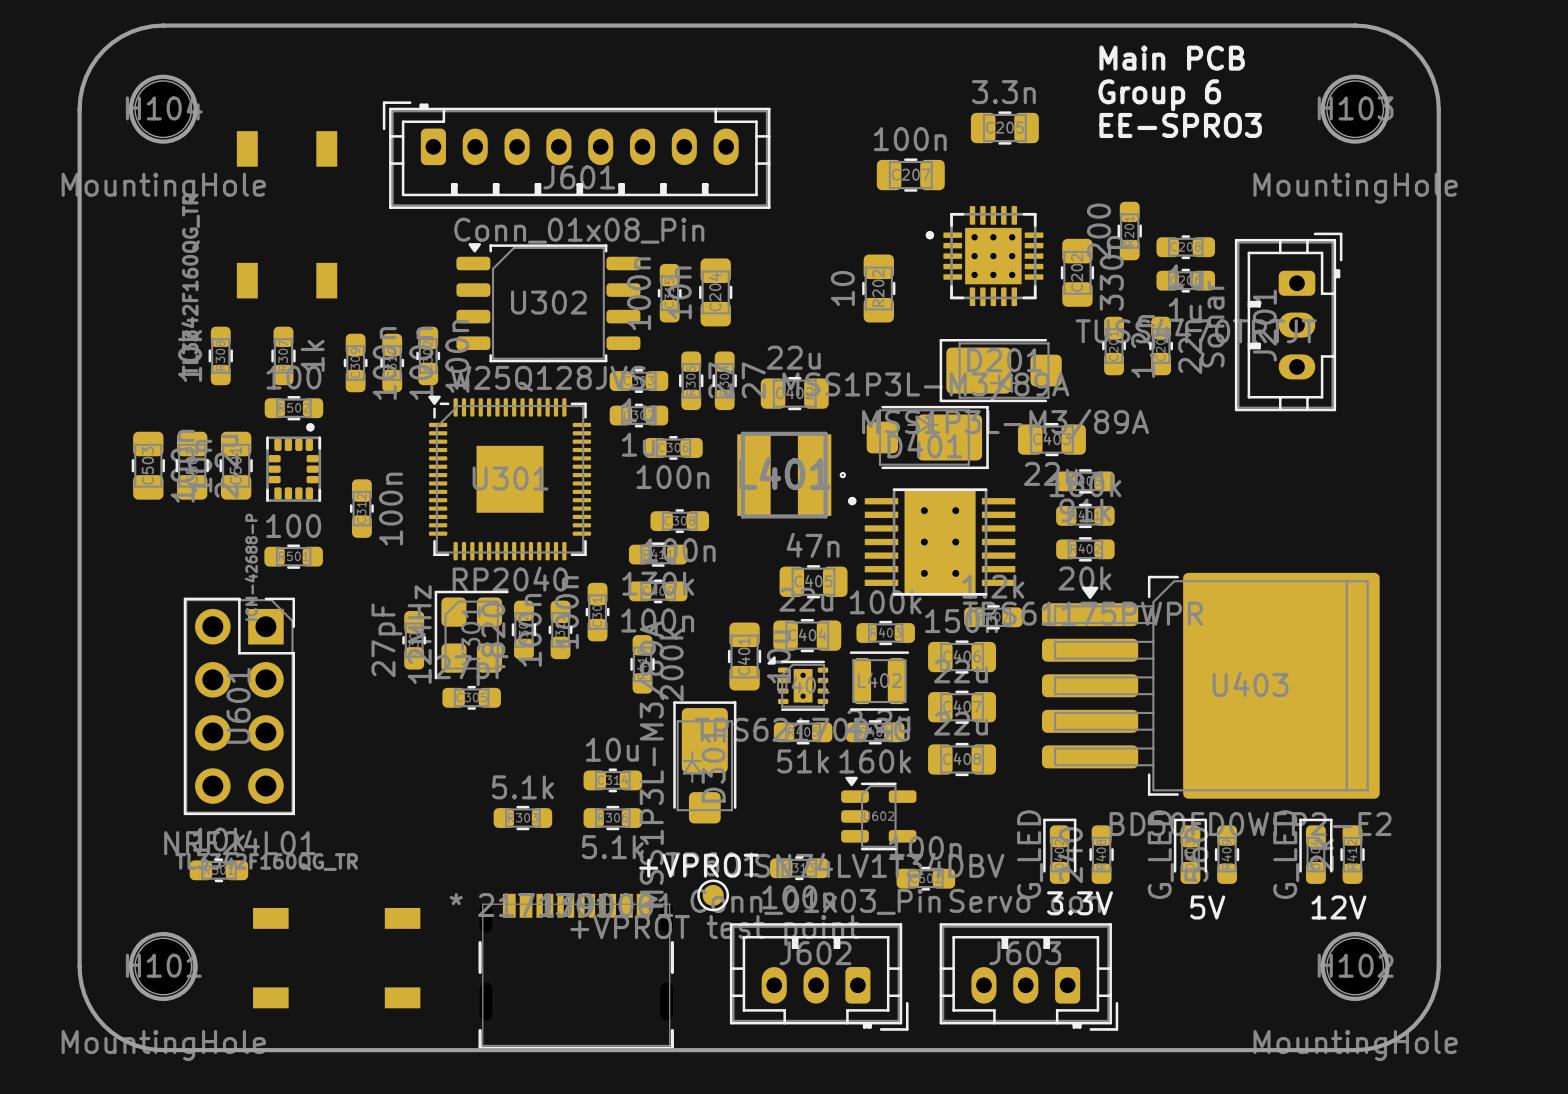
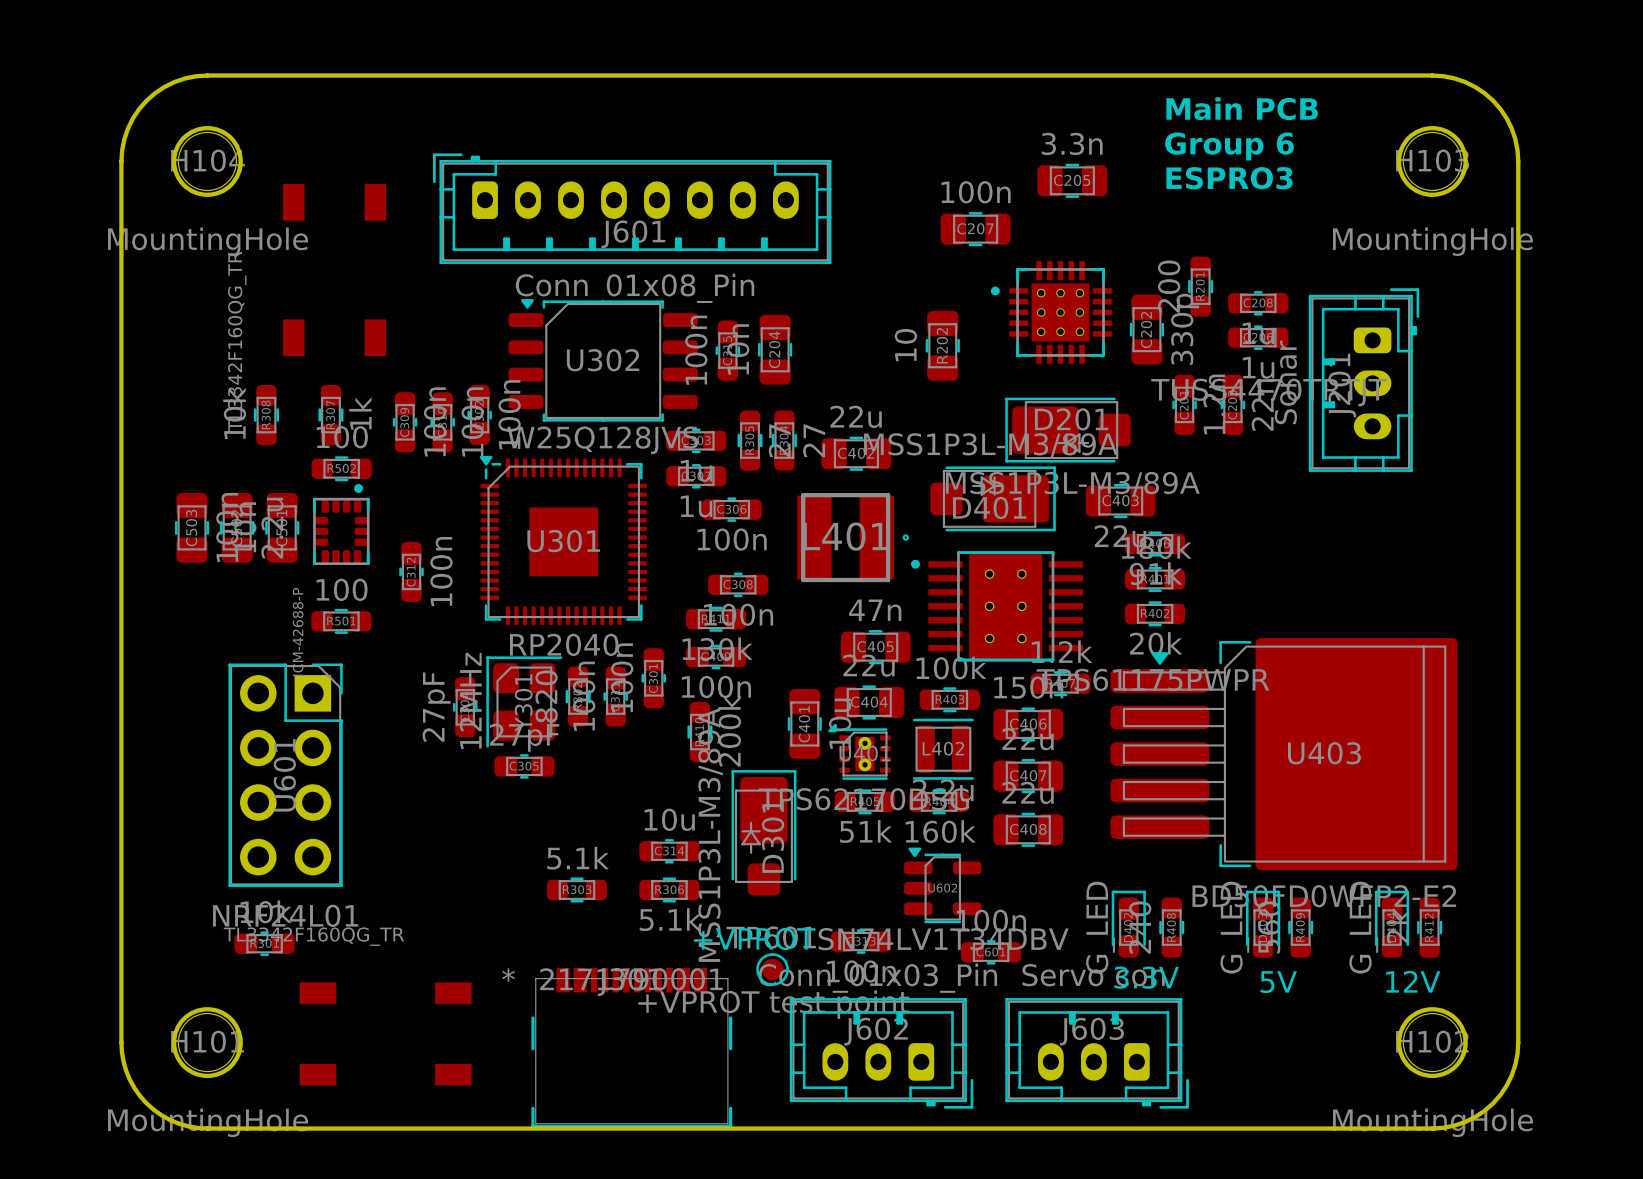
text: EE-SPRO3 (1180, 125) -> ESPRO3 (1229, 178)

